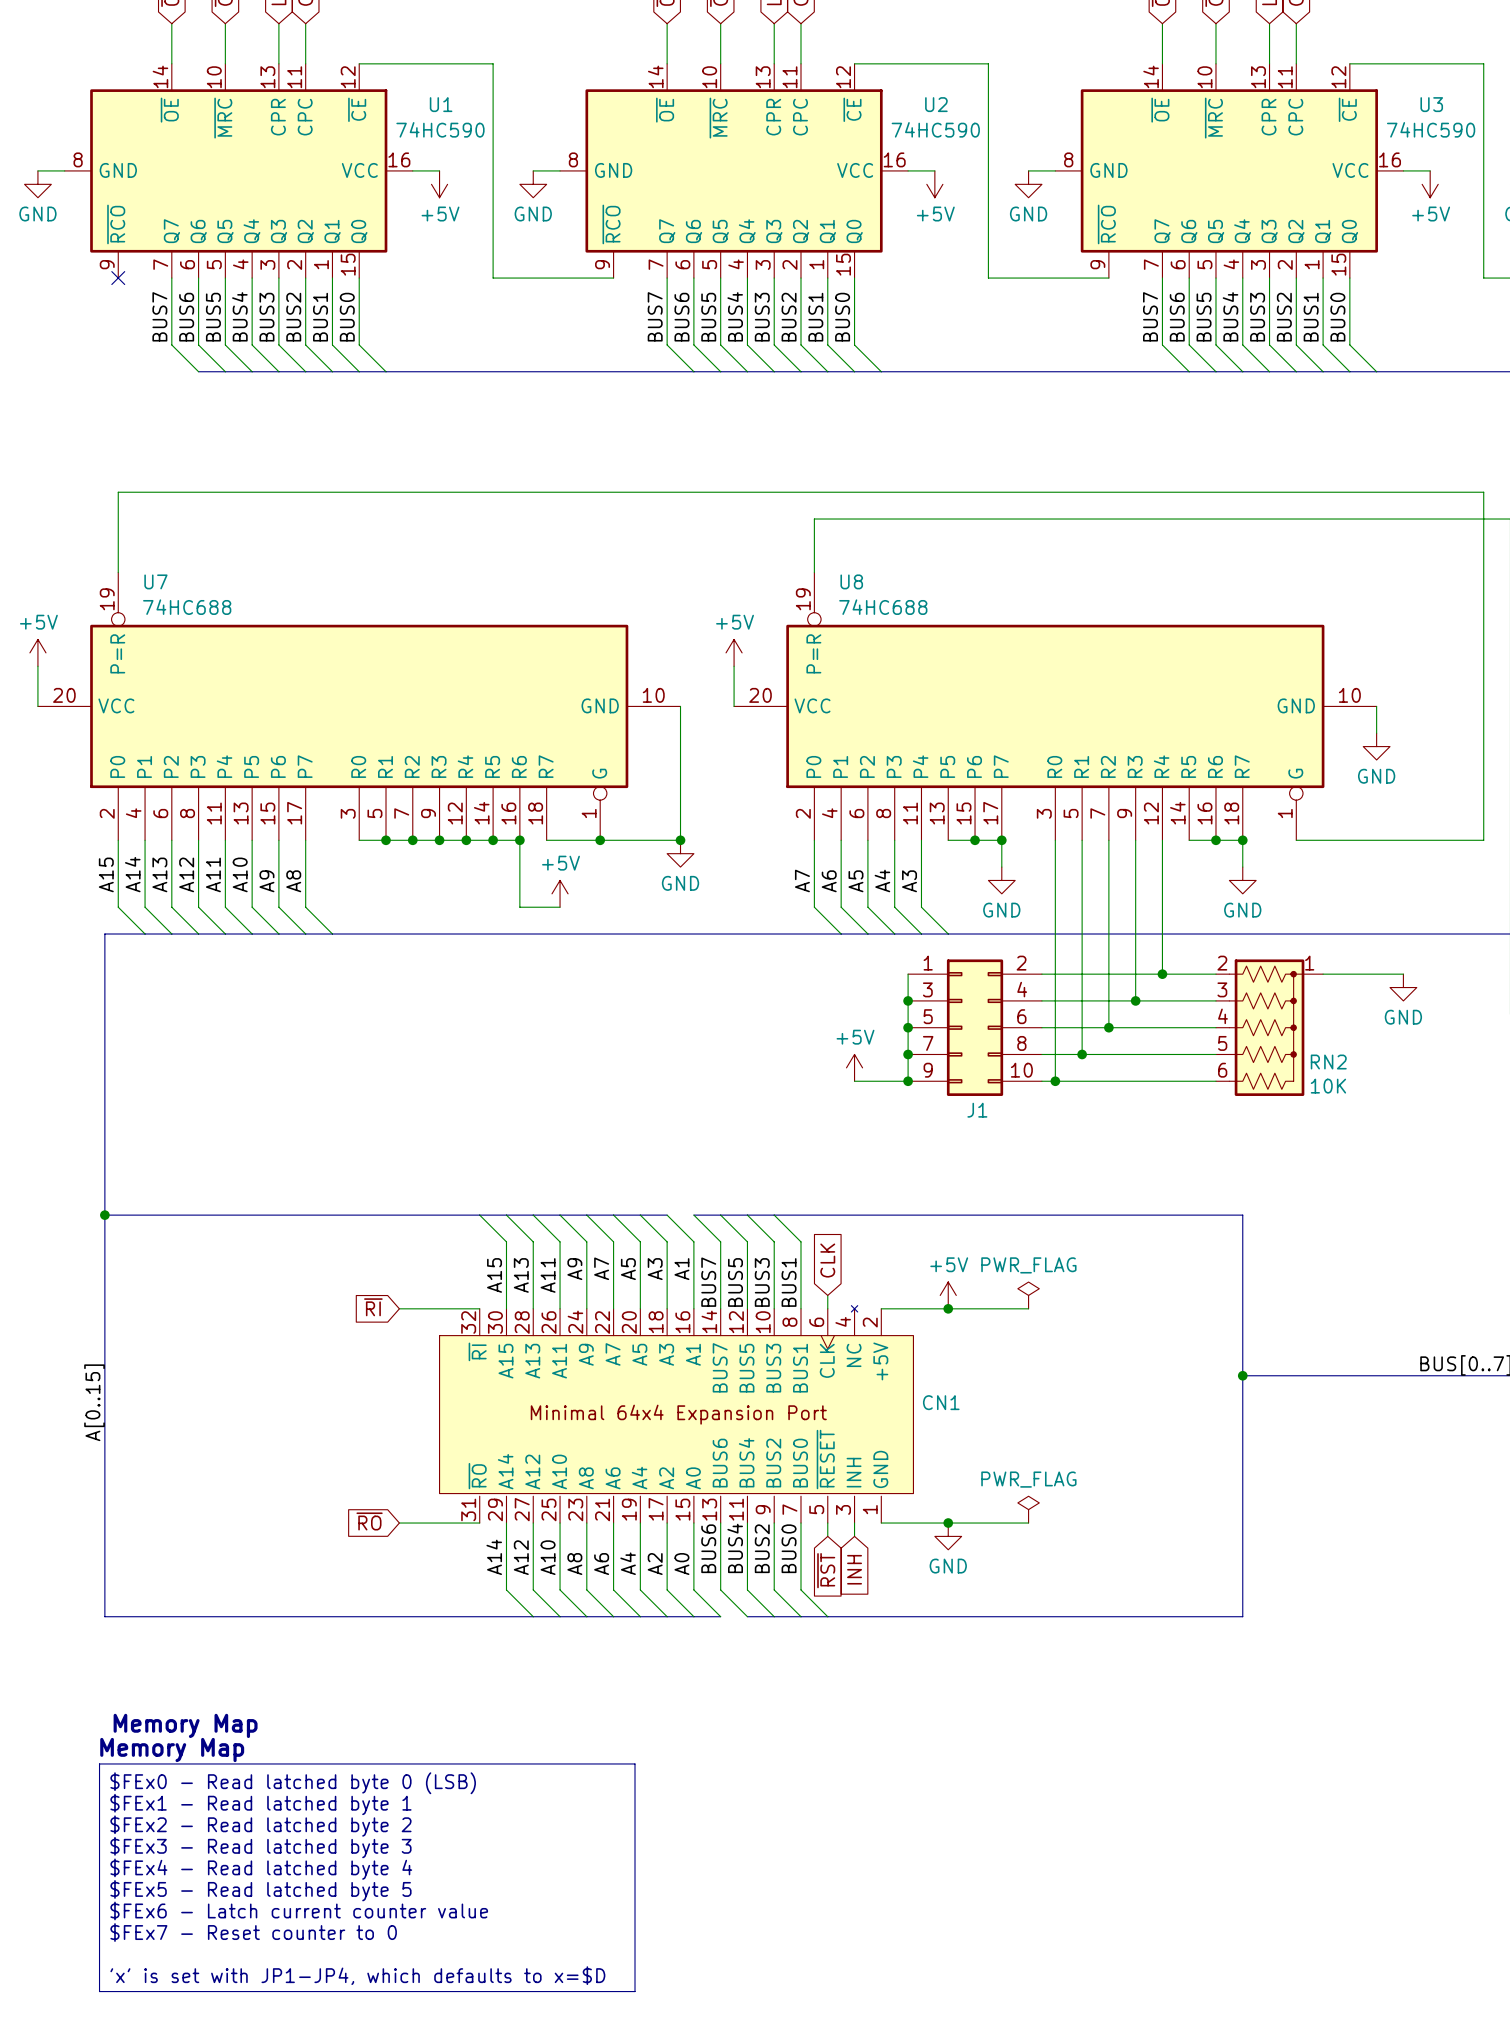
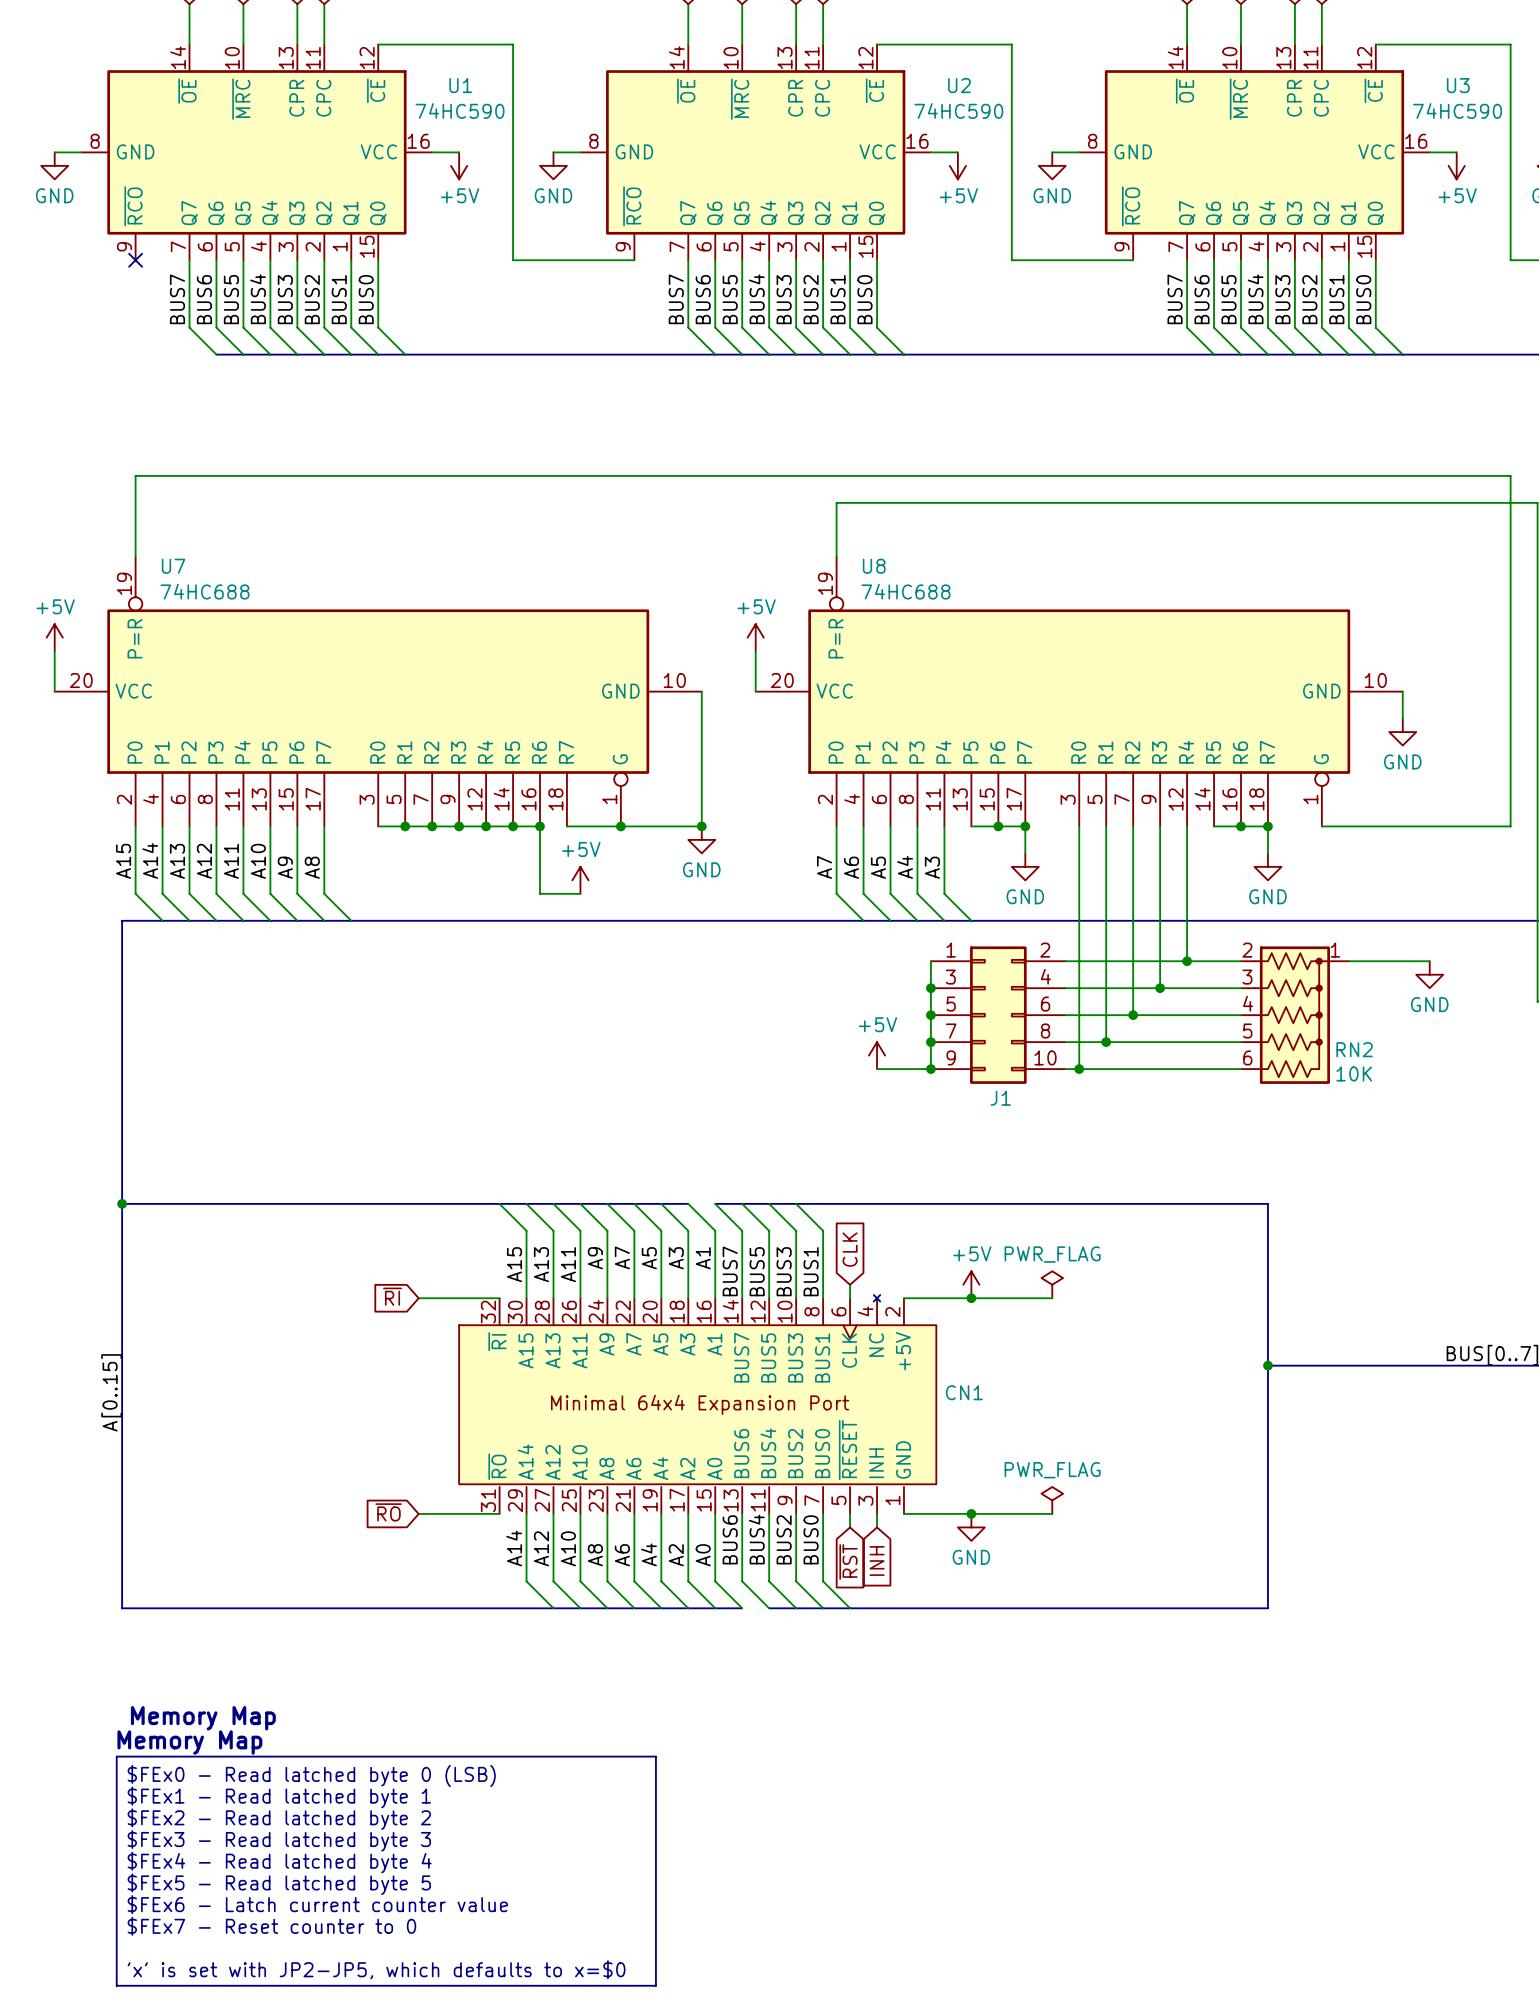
text: 'x' is set with JP1-JP4, which defaults to x=$D (357, 1975) -> 'x' is set with JP2-JP5, which defaults to x=$0 (376, 1969)

